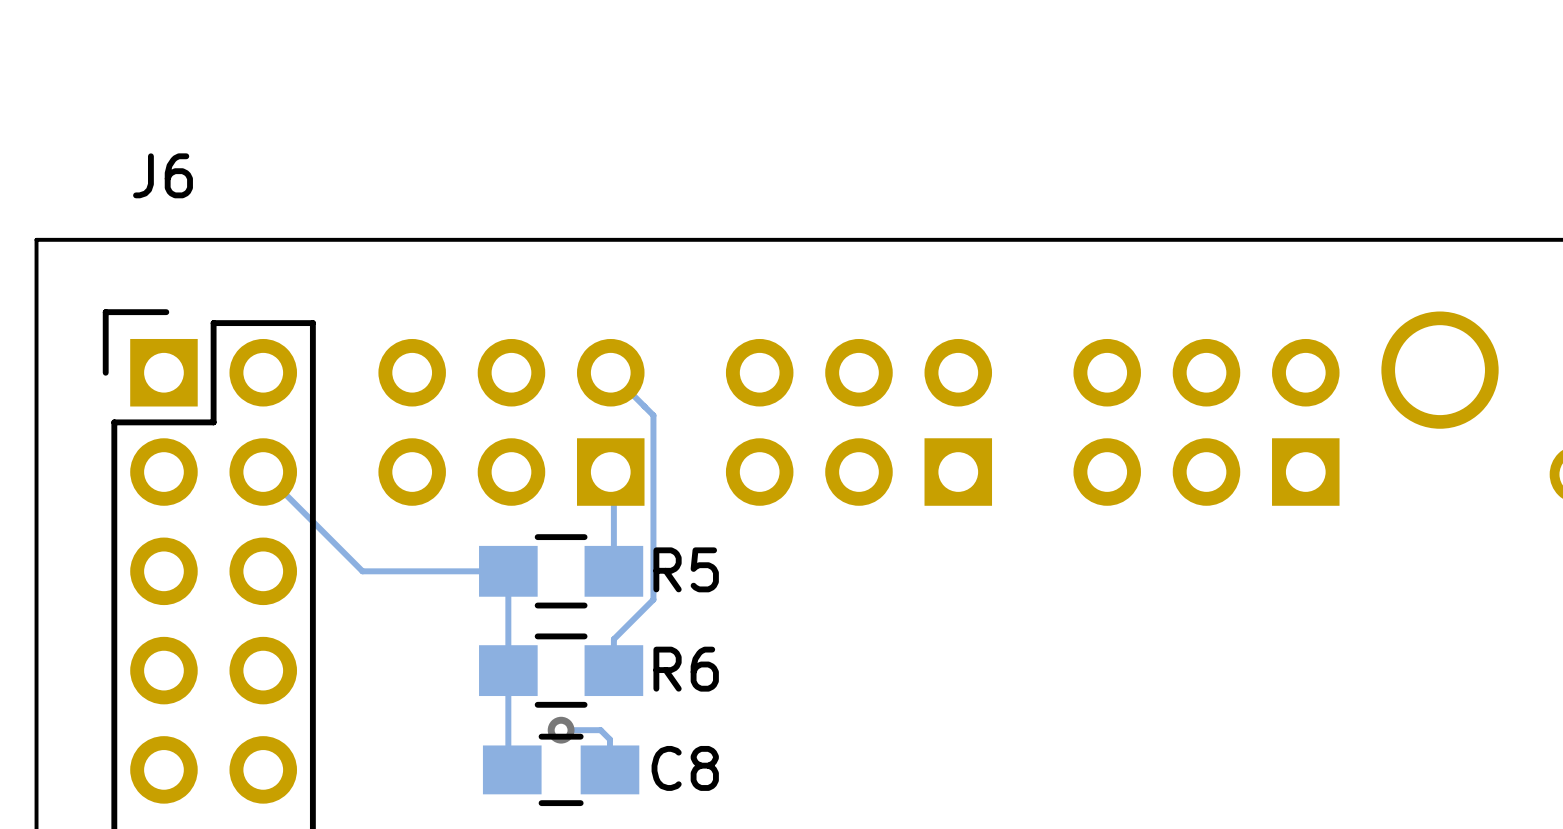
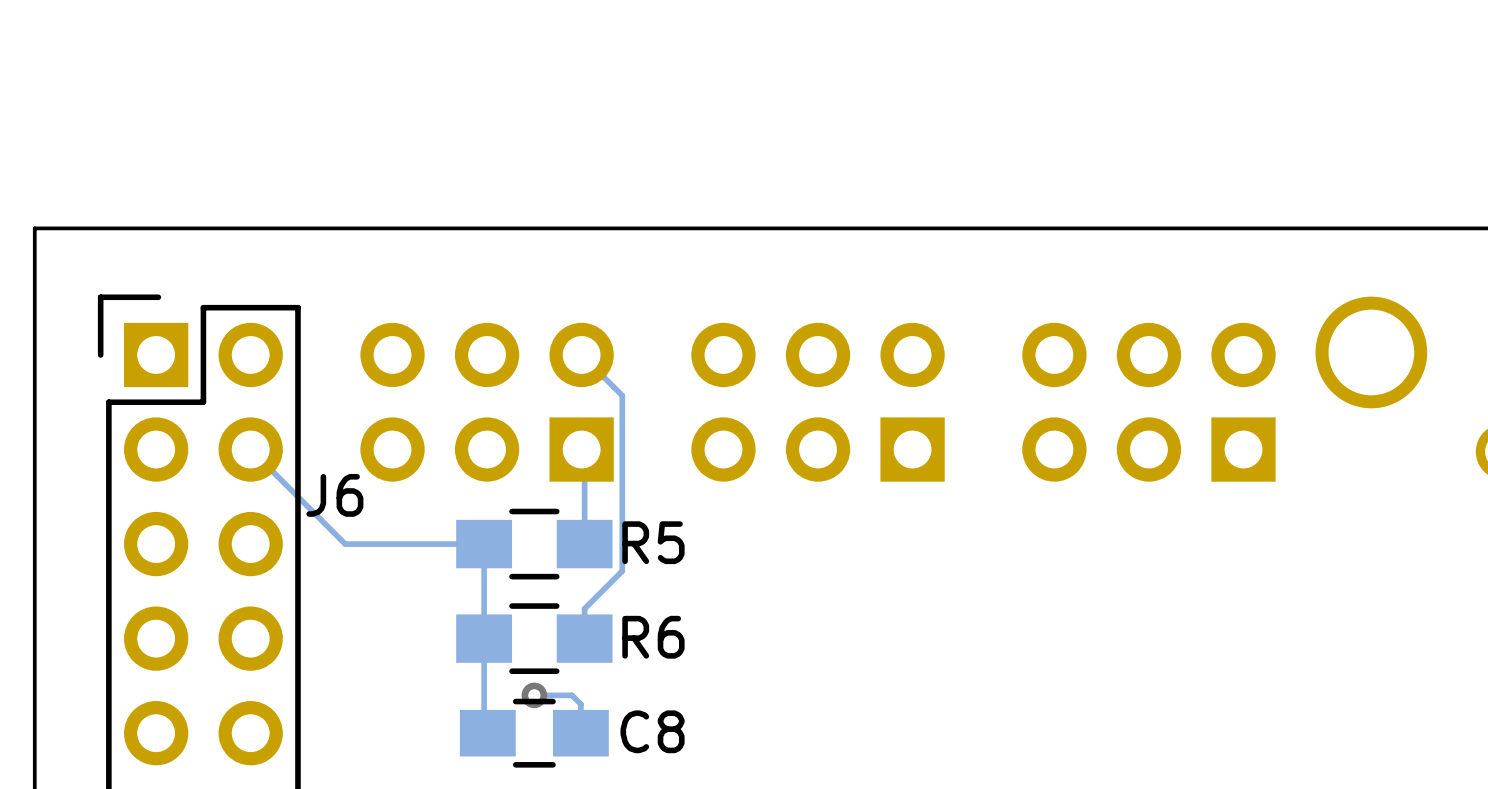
J6 name position: J6 (163, 175) -> J6 (334, 495)

